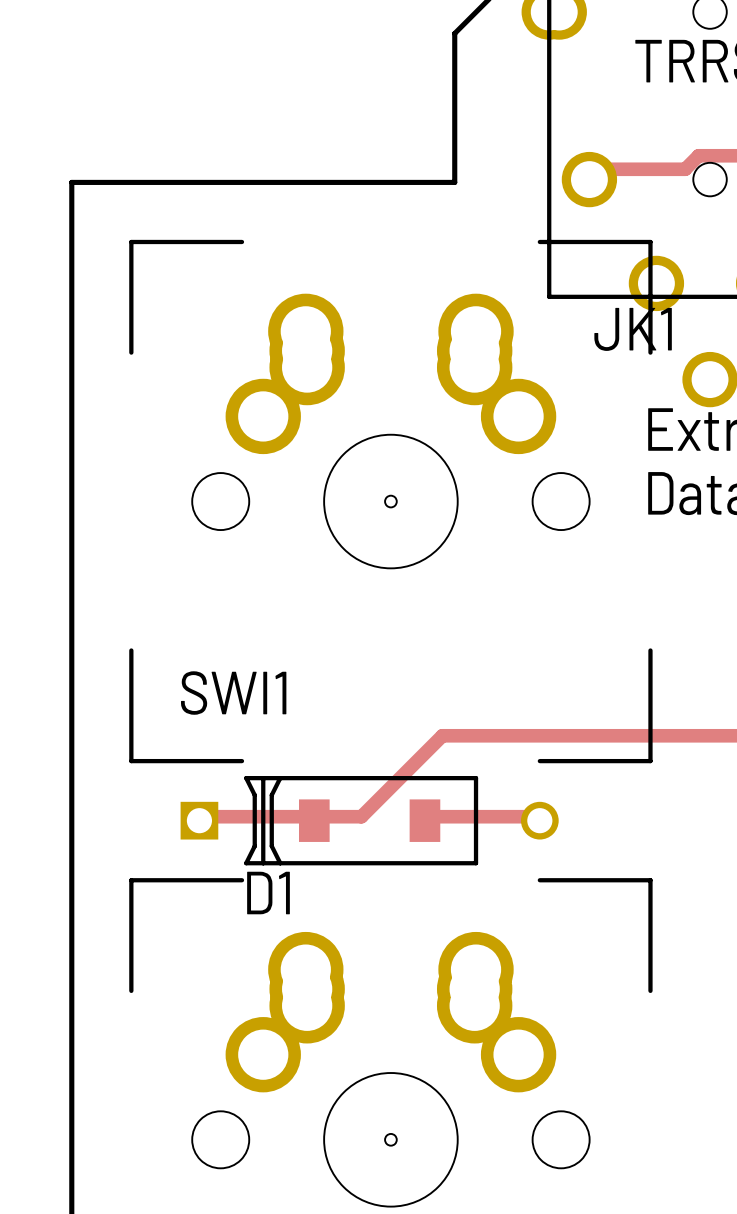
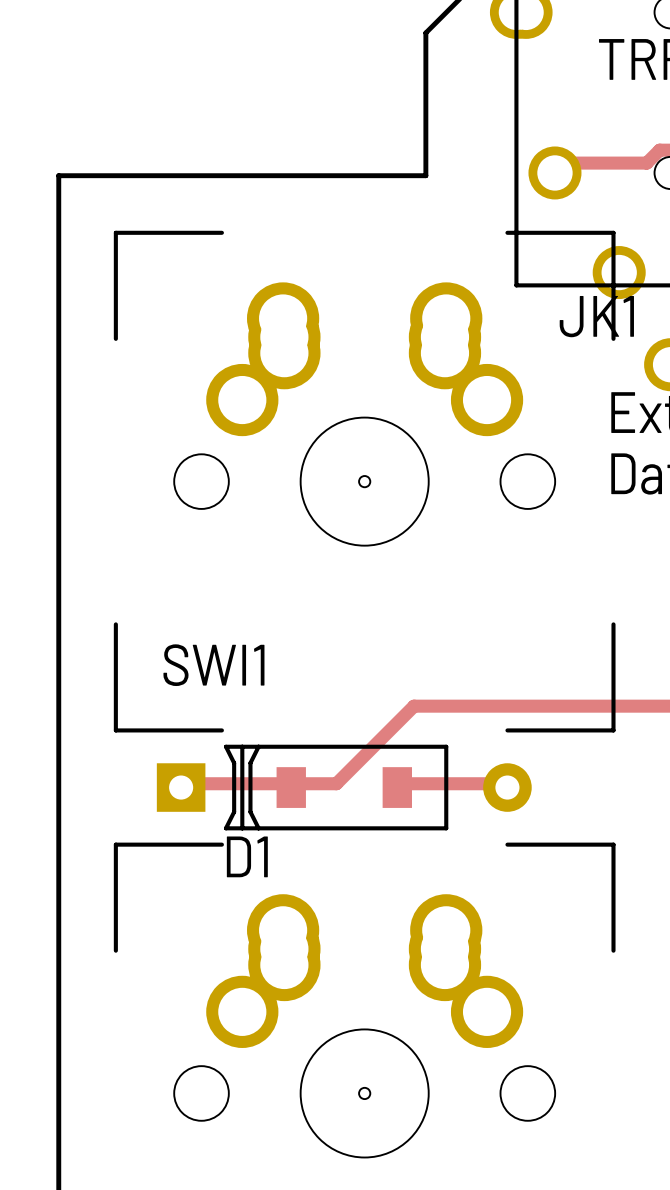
D1 footprint: [180, 776, 559, 866] -> [156, 744, 532, 831]

